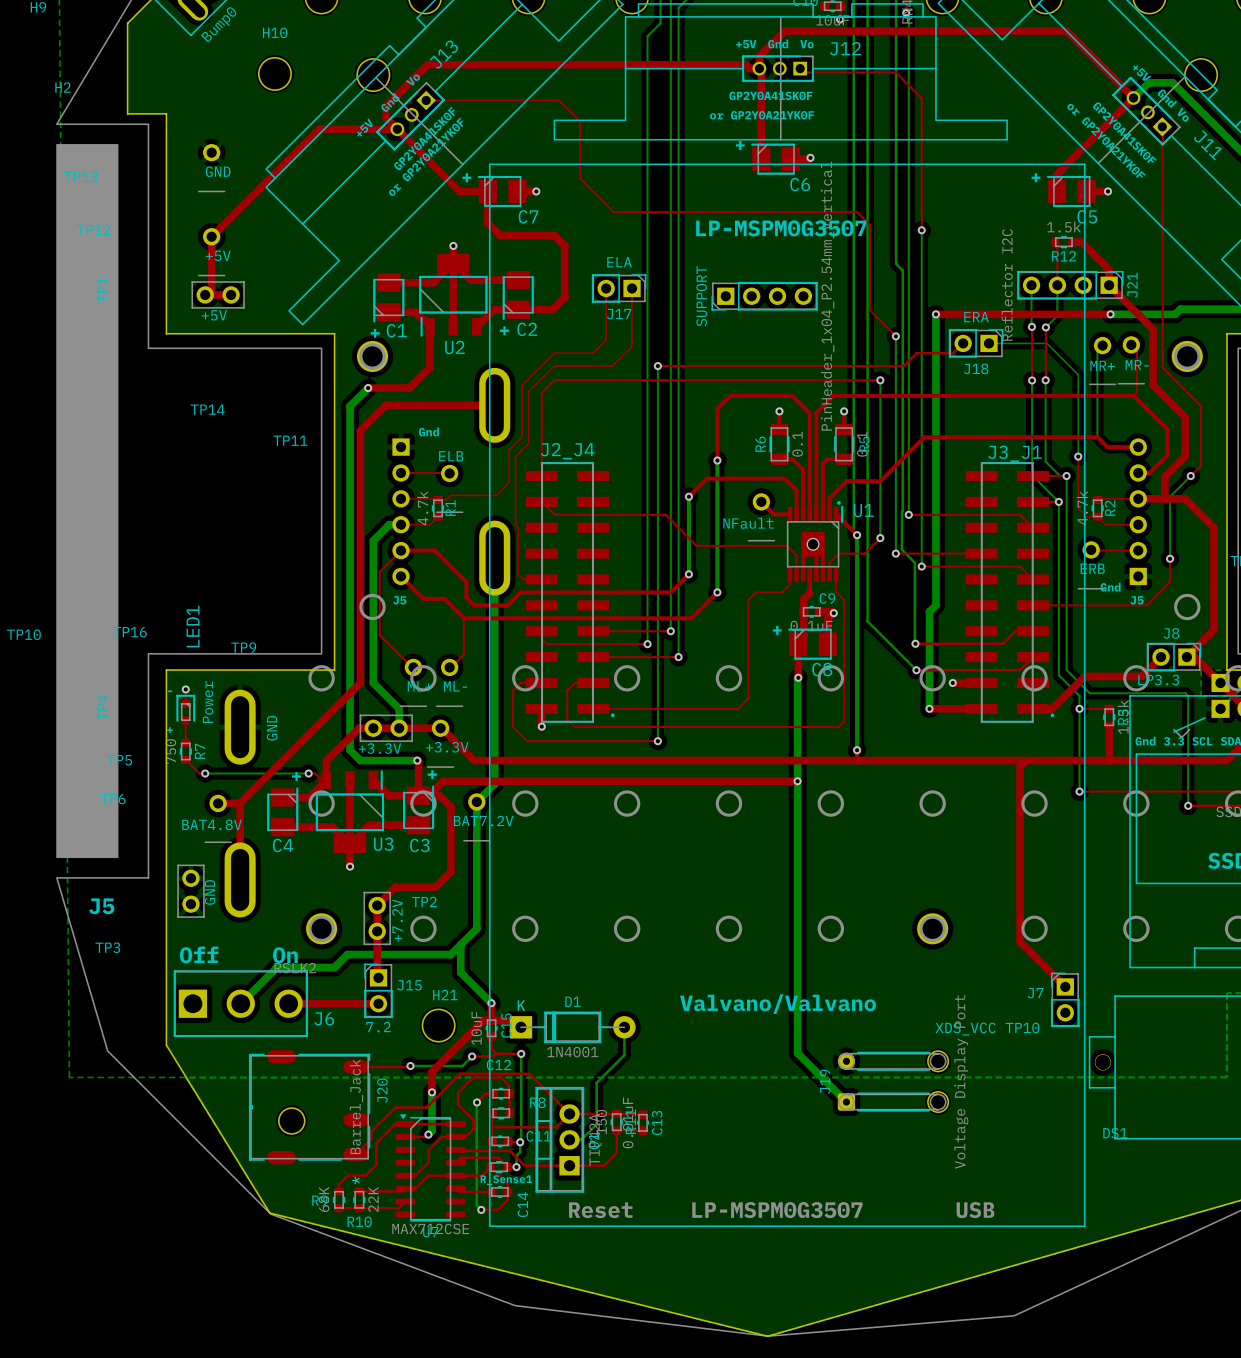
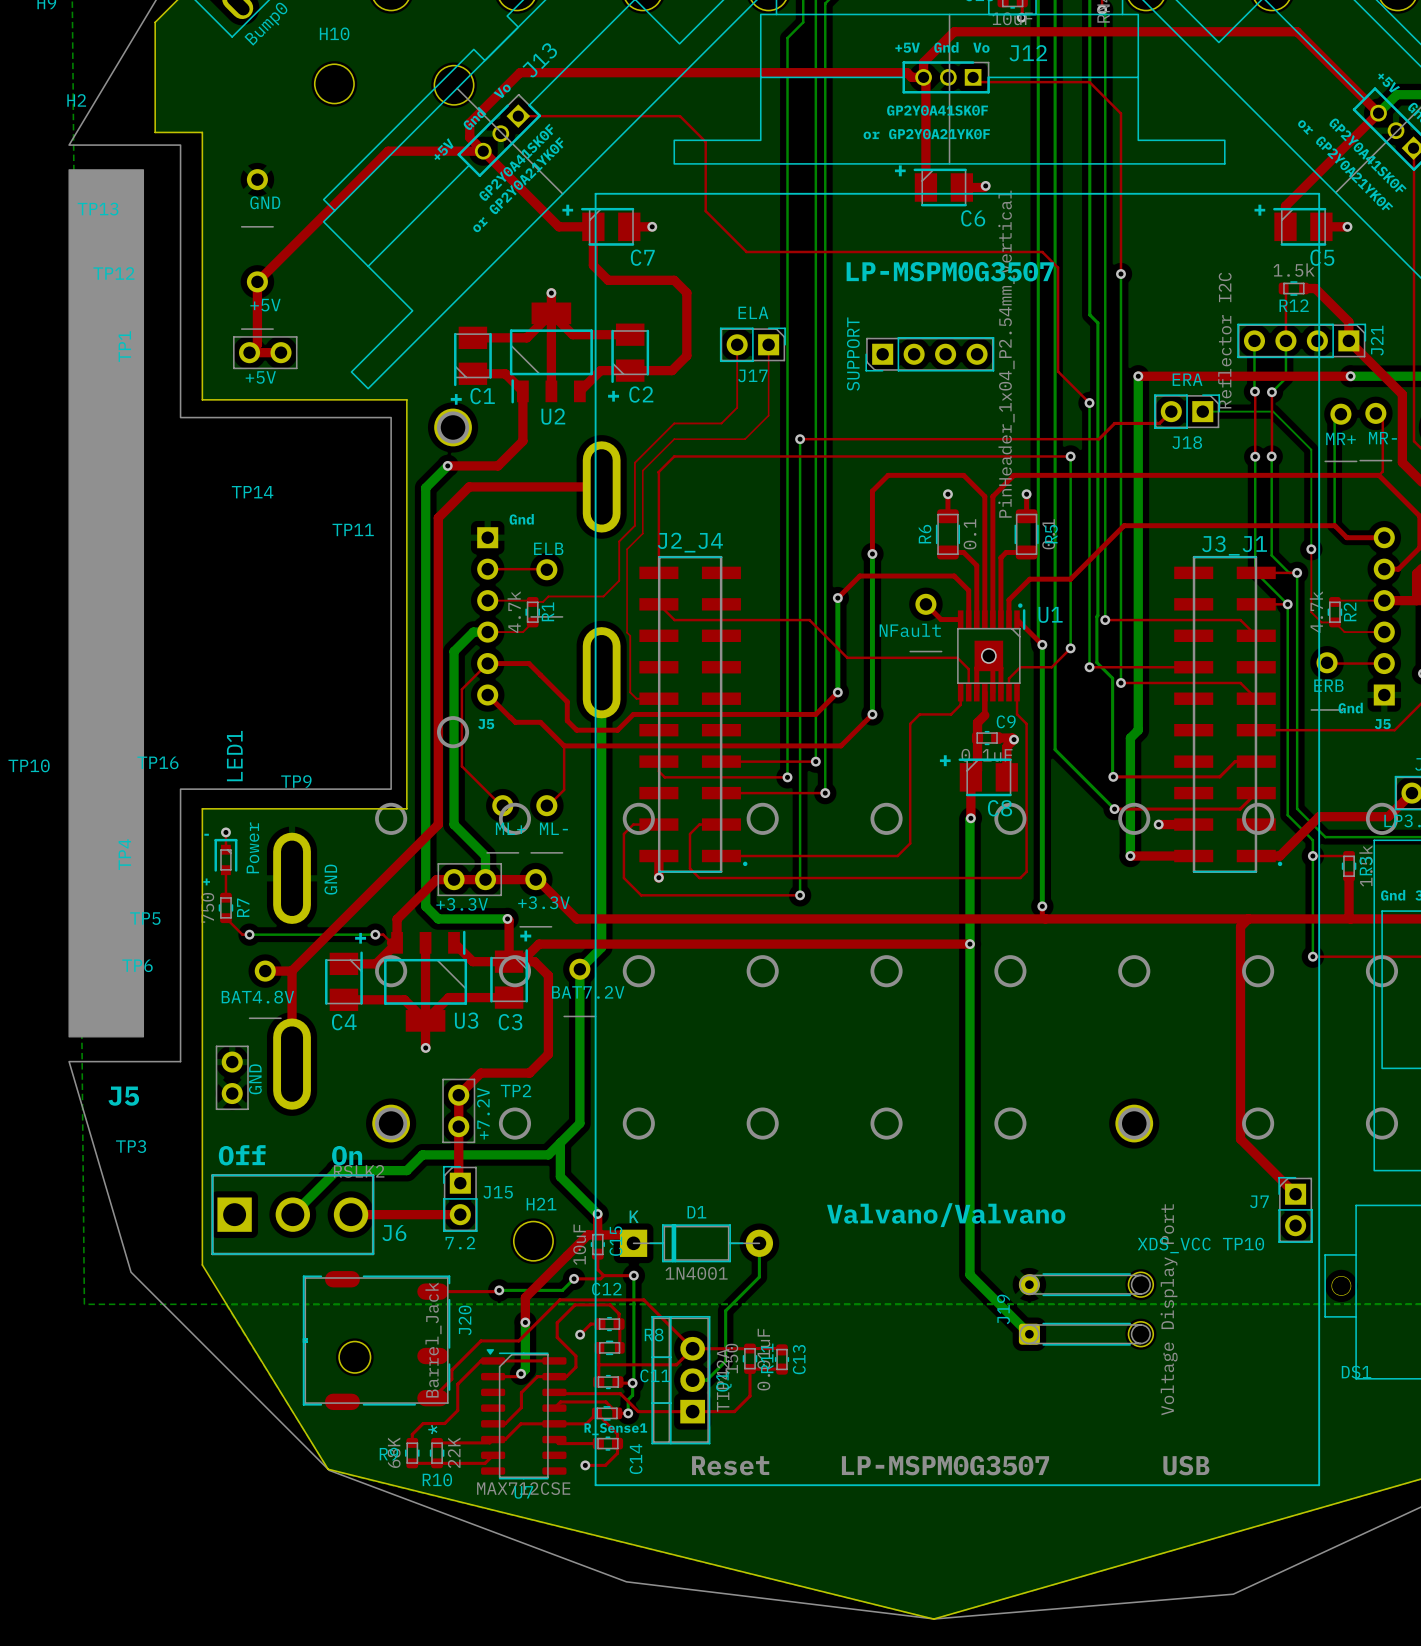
bottom track: (476, 1102) (476, 1205) (481, 1209) -> none

